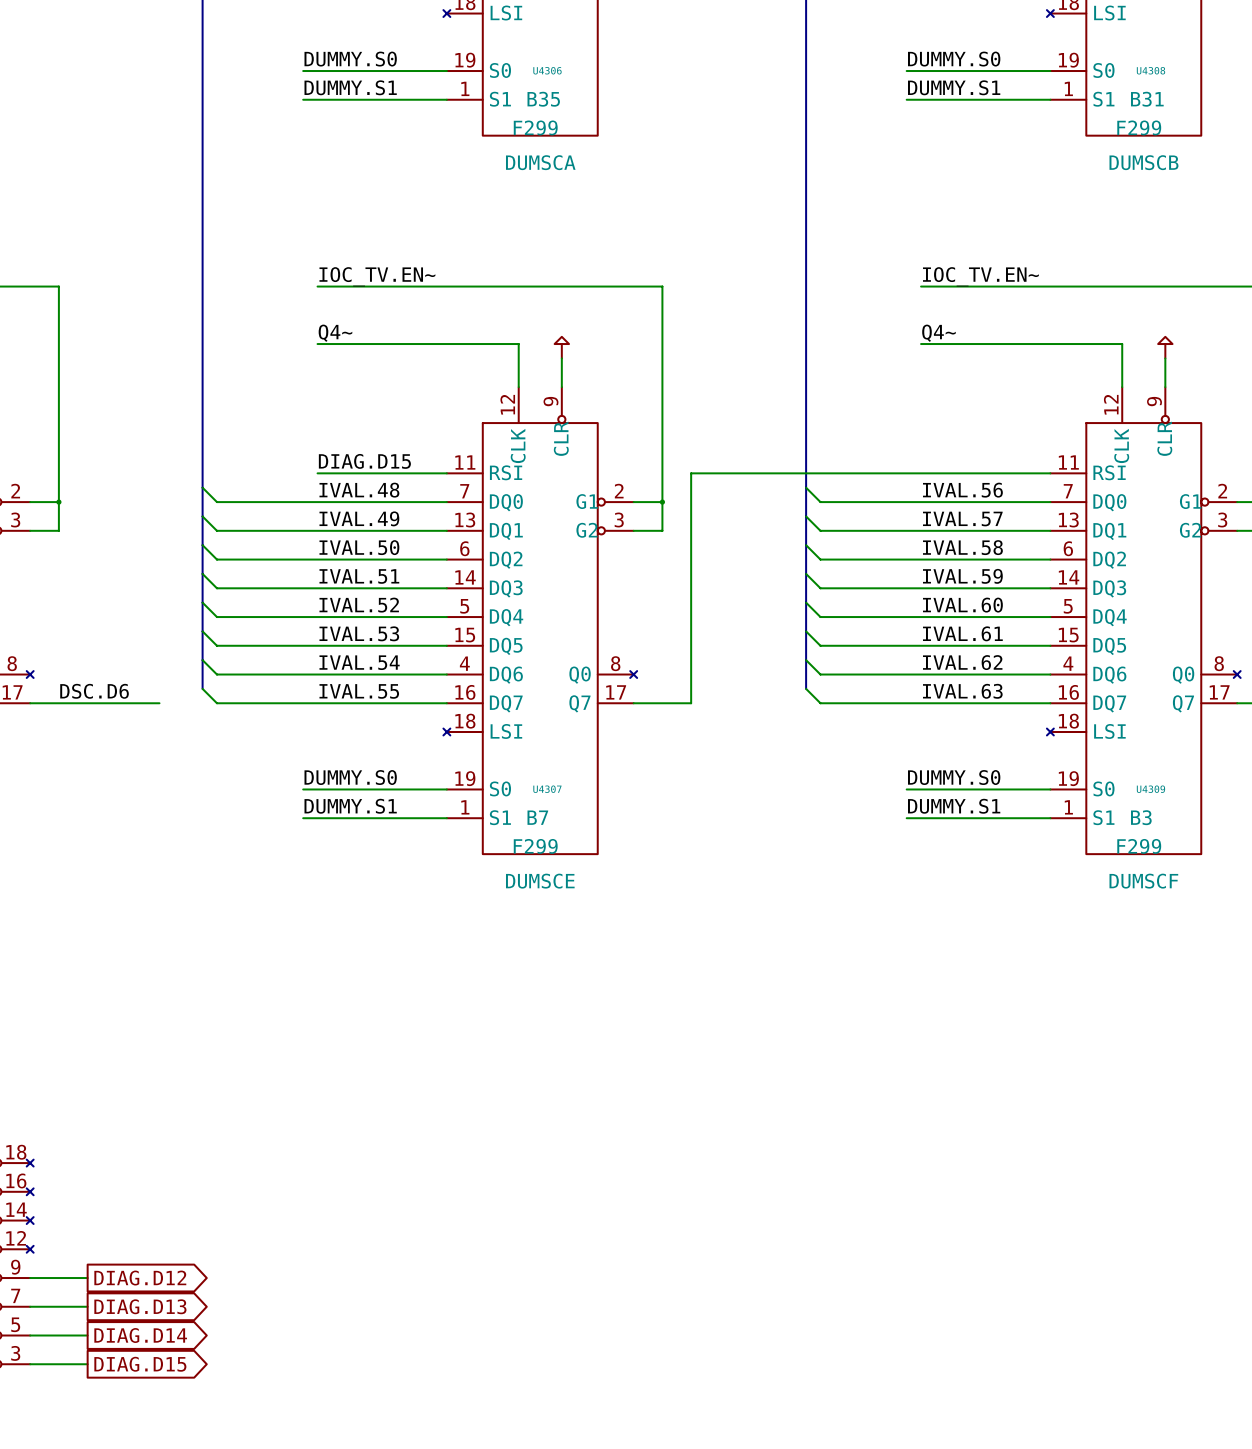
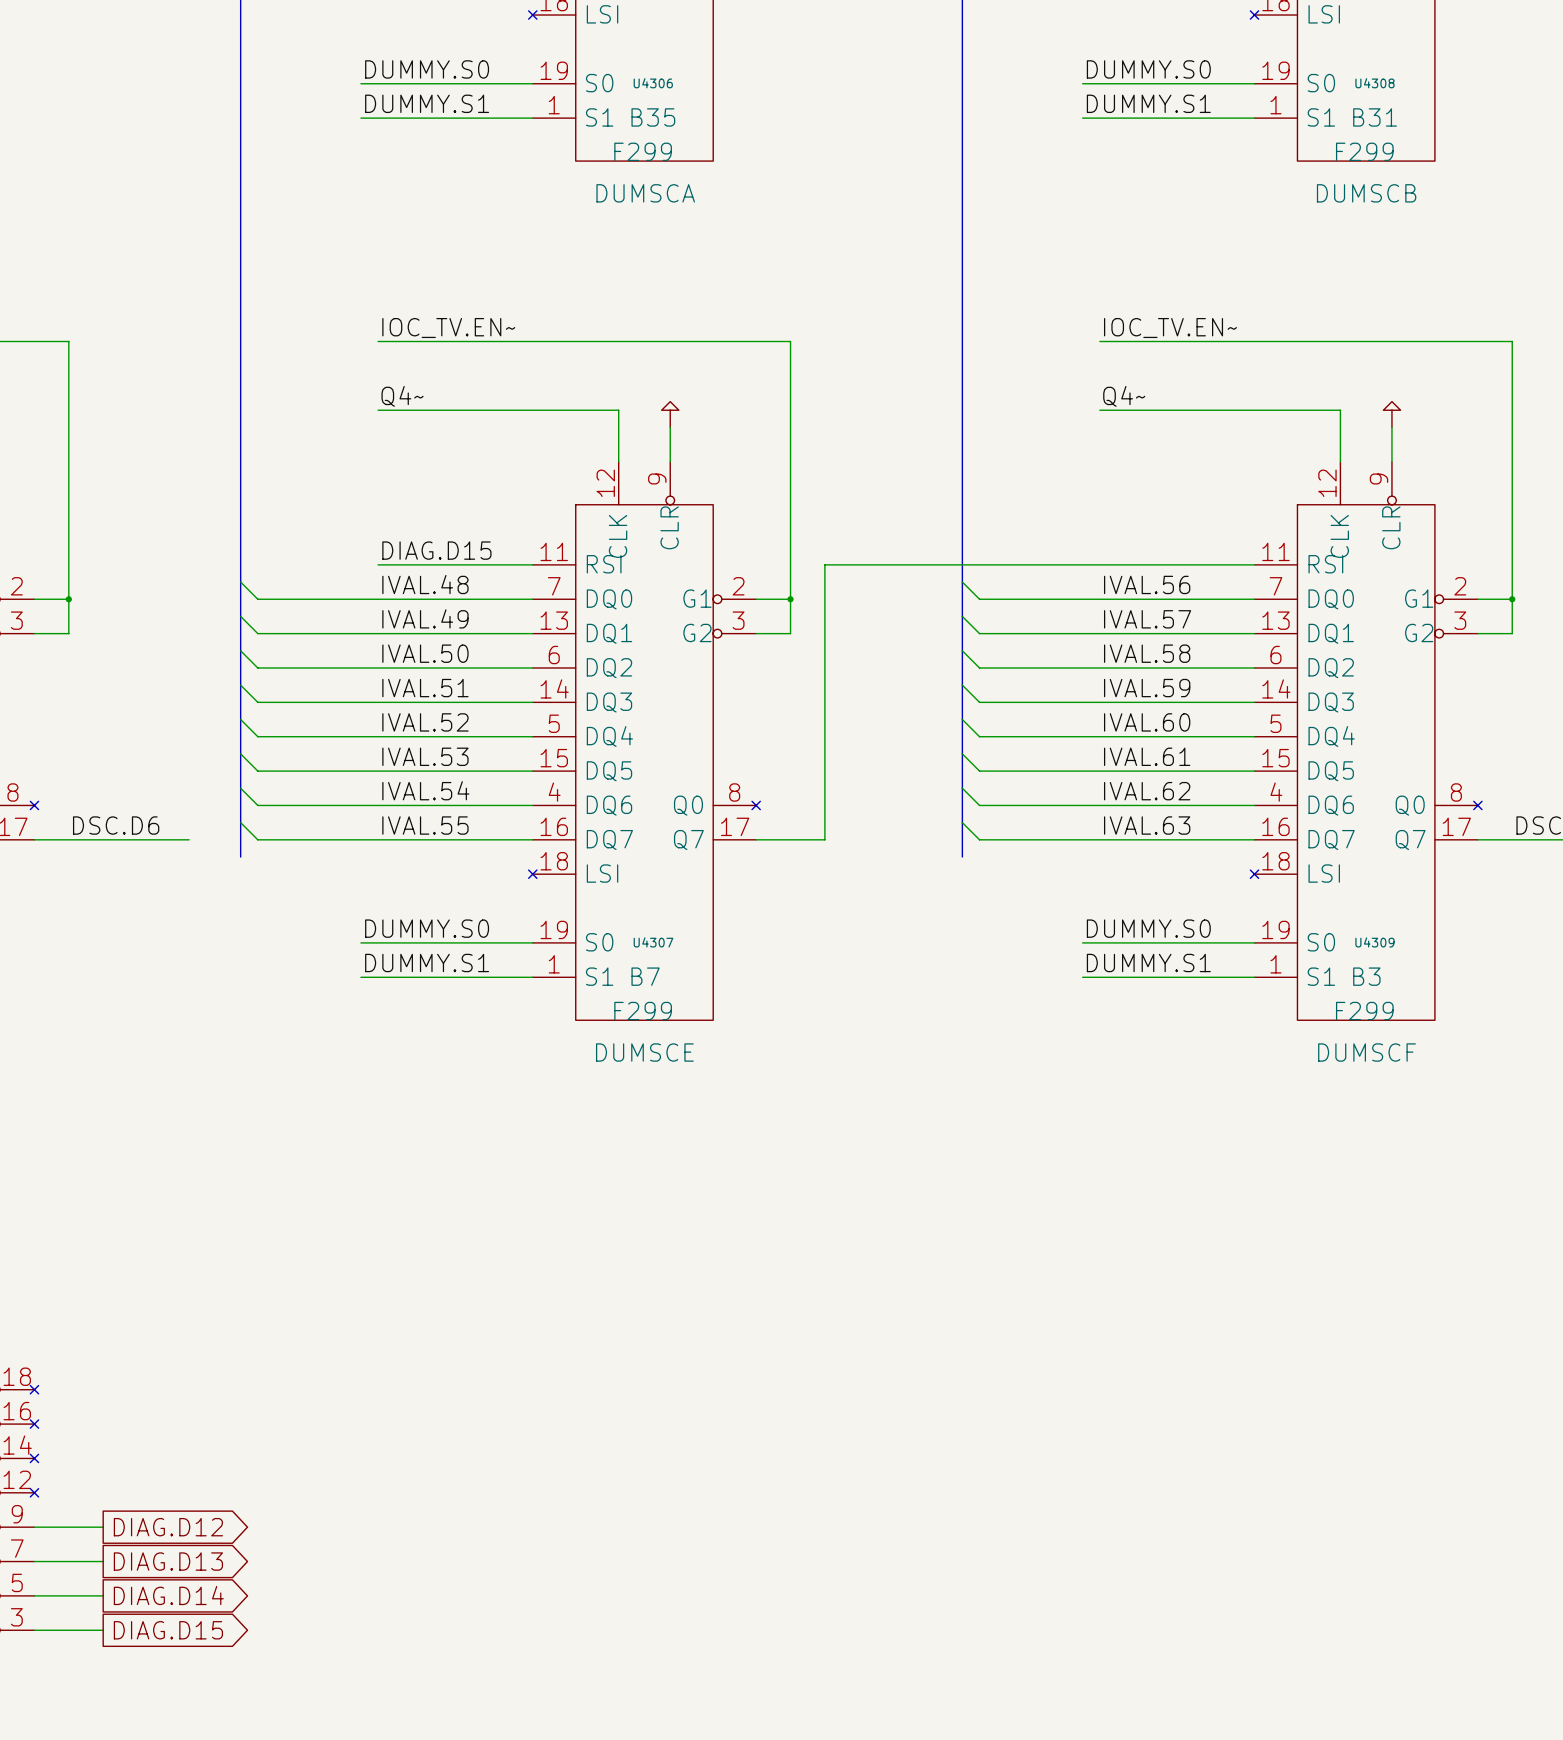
bus: none -> (240, 822) (240, 857)
bus: none -> (962, 822) (962, 857)

